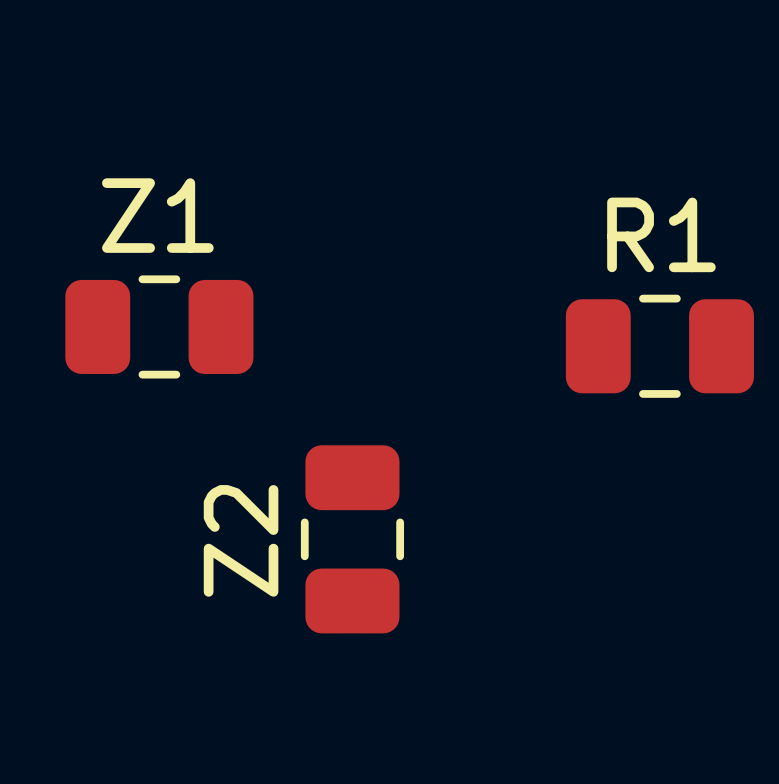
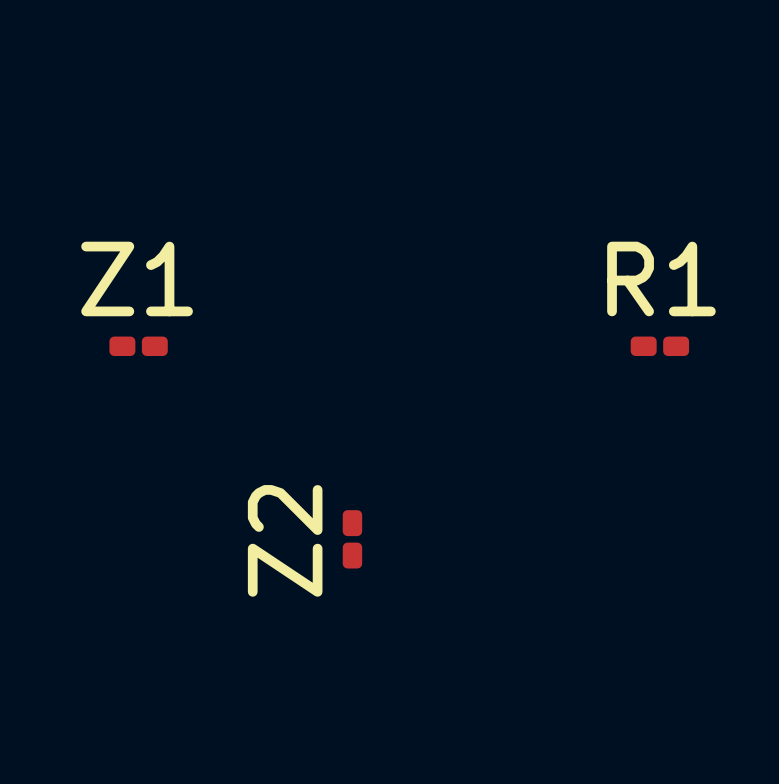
Z1 footprint: [65, 275, 254, 379] -> [109, 336, 168, 357]
R1 footprint: [565, 294, 754, 398] -> [630, 336, 690, 357]
Z2 footprint: [300, 445, 405, 634] -> [342, 510, 363, 569]

